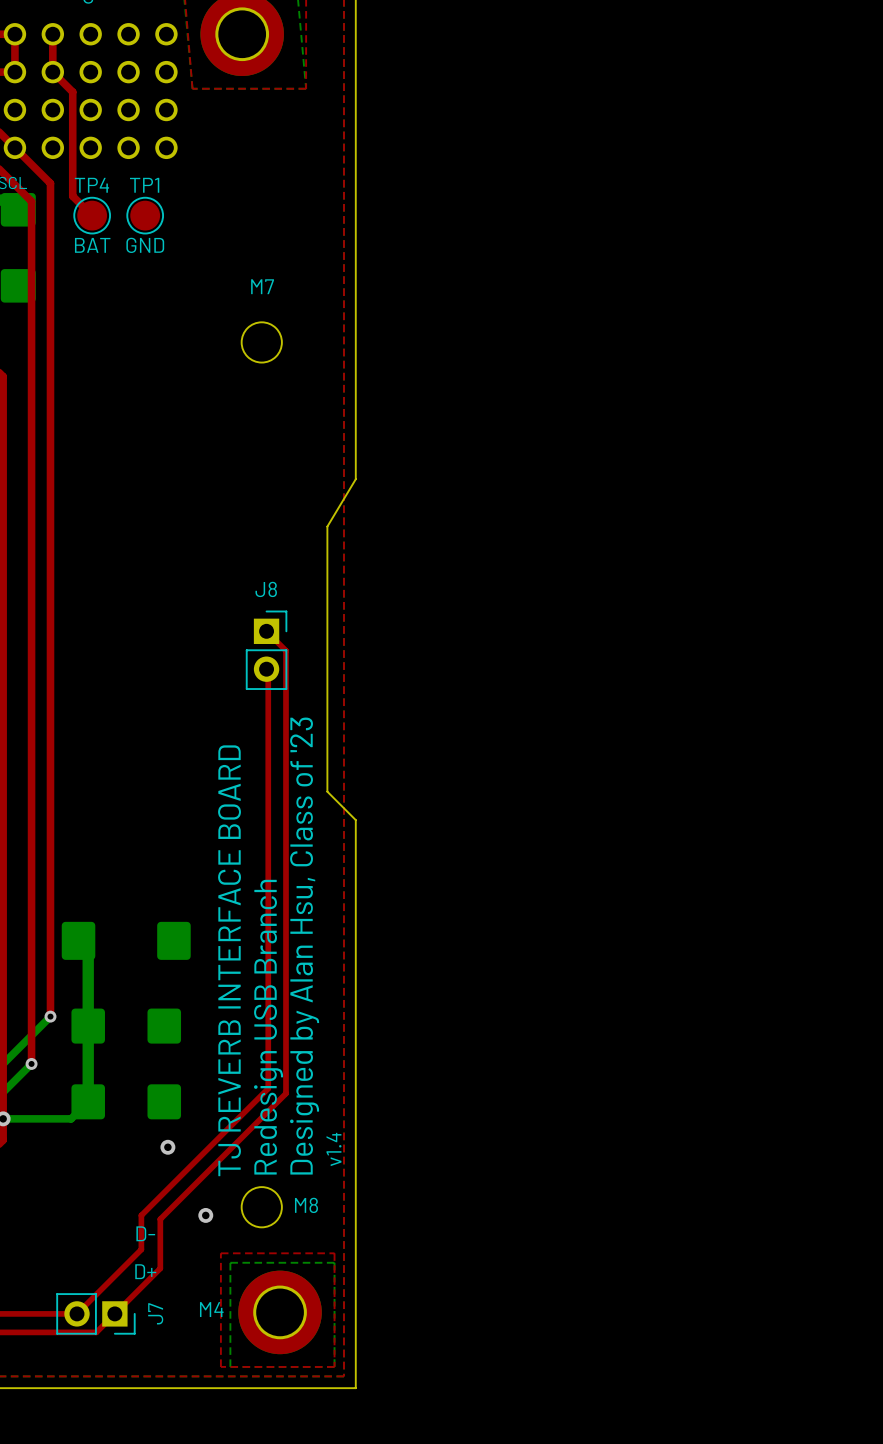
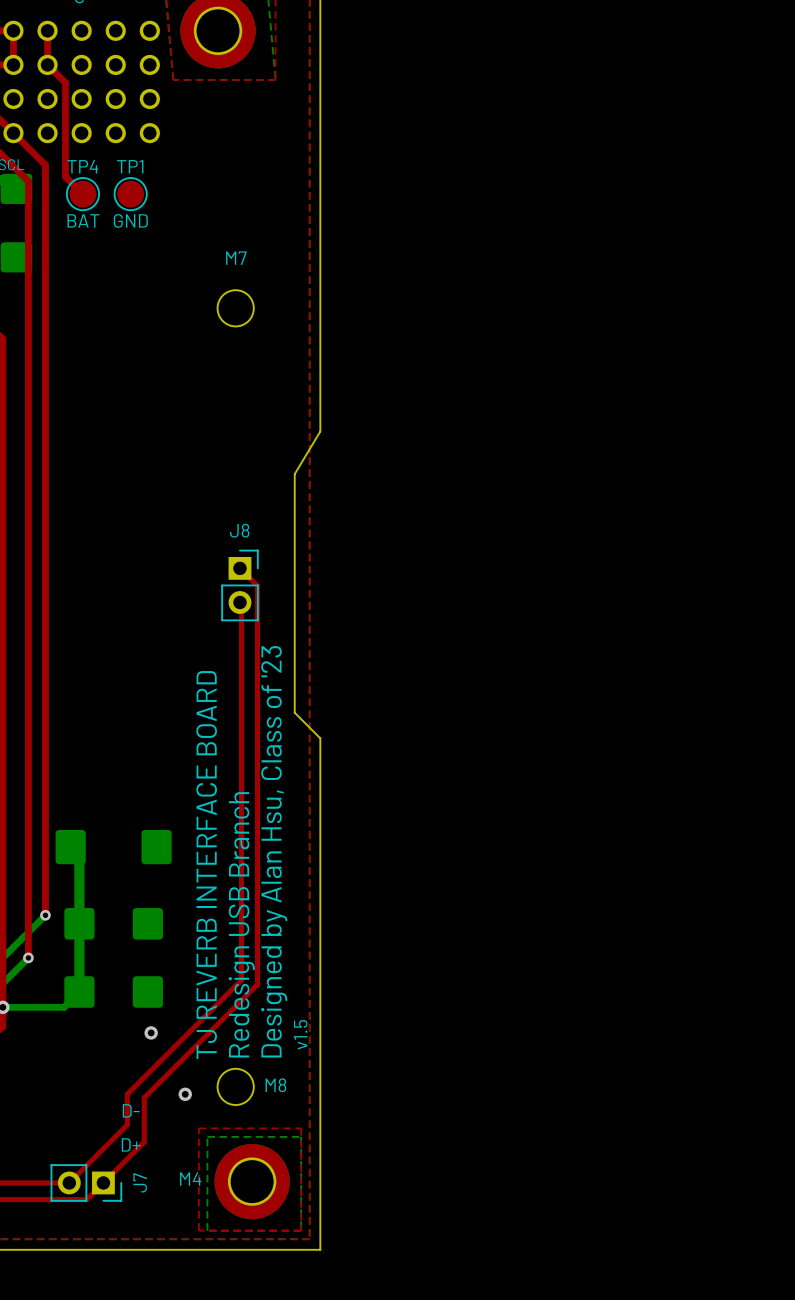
text: v1.4 (333, 1149) -> v1.5 (300, 1034)

